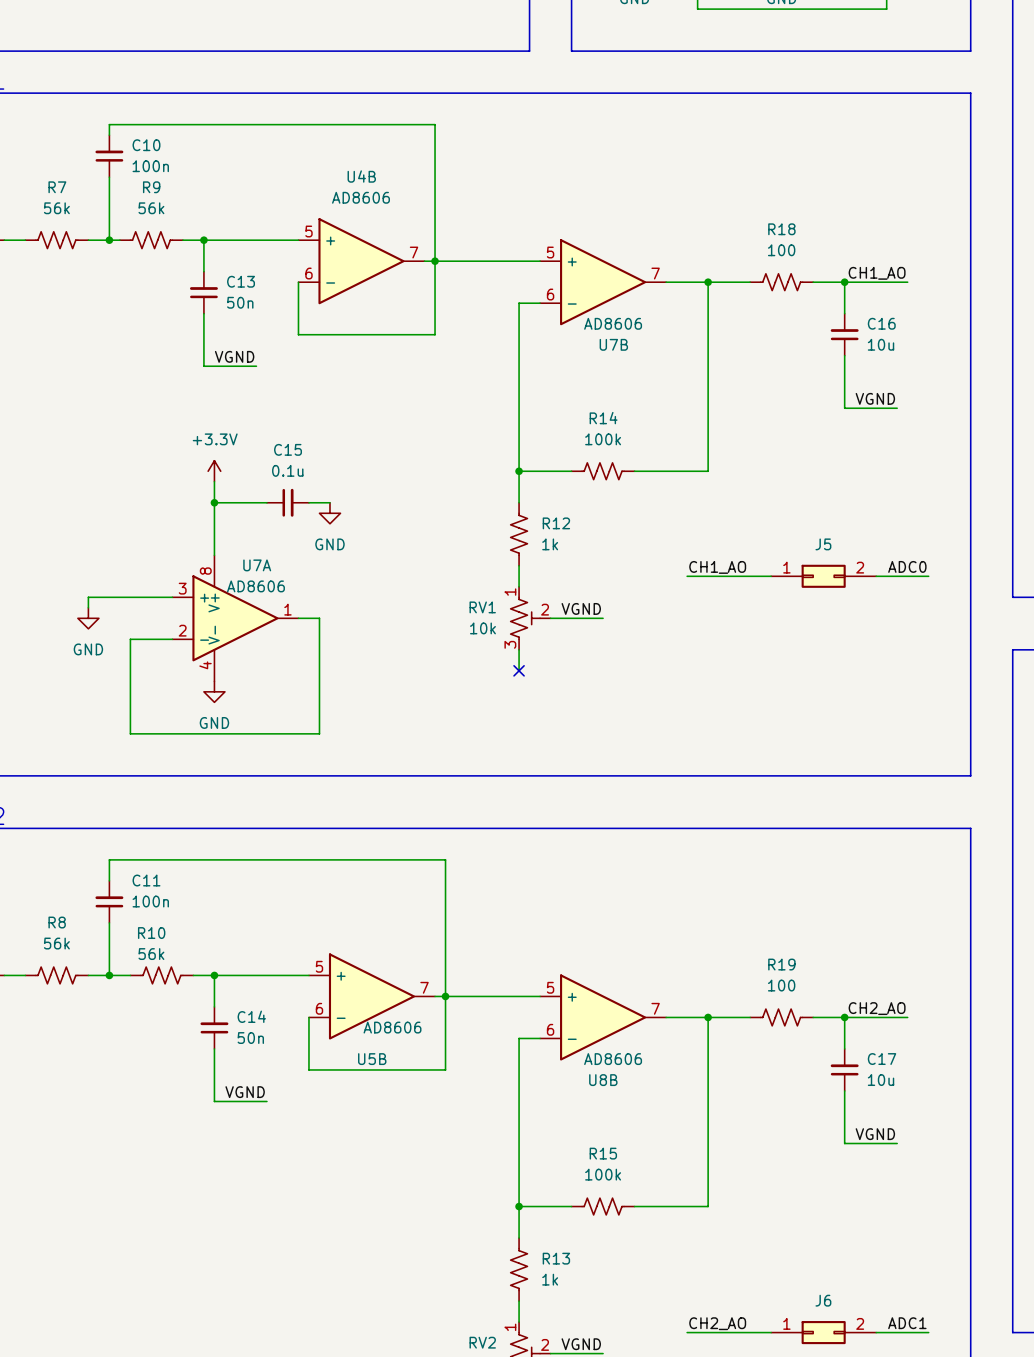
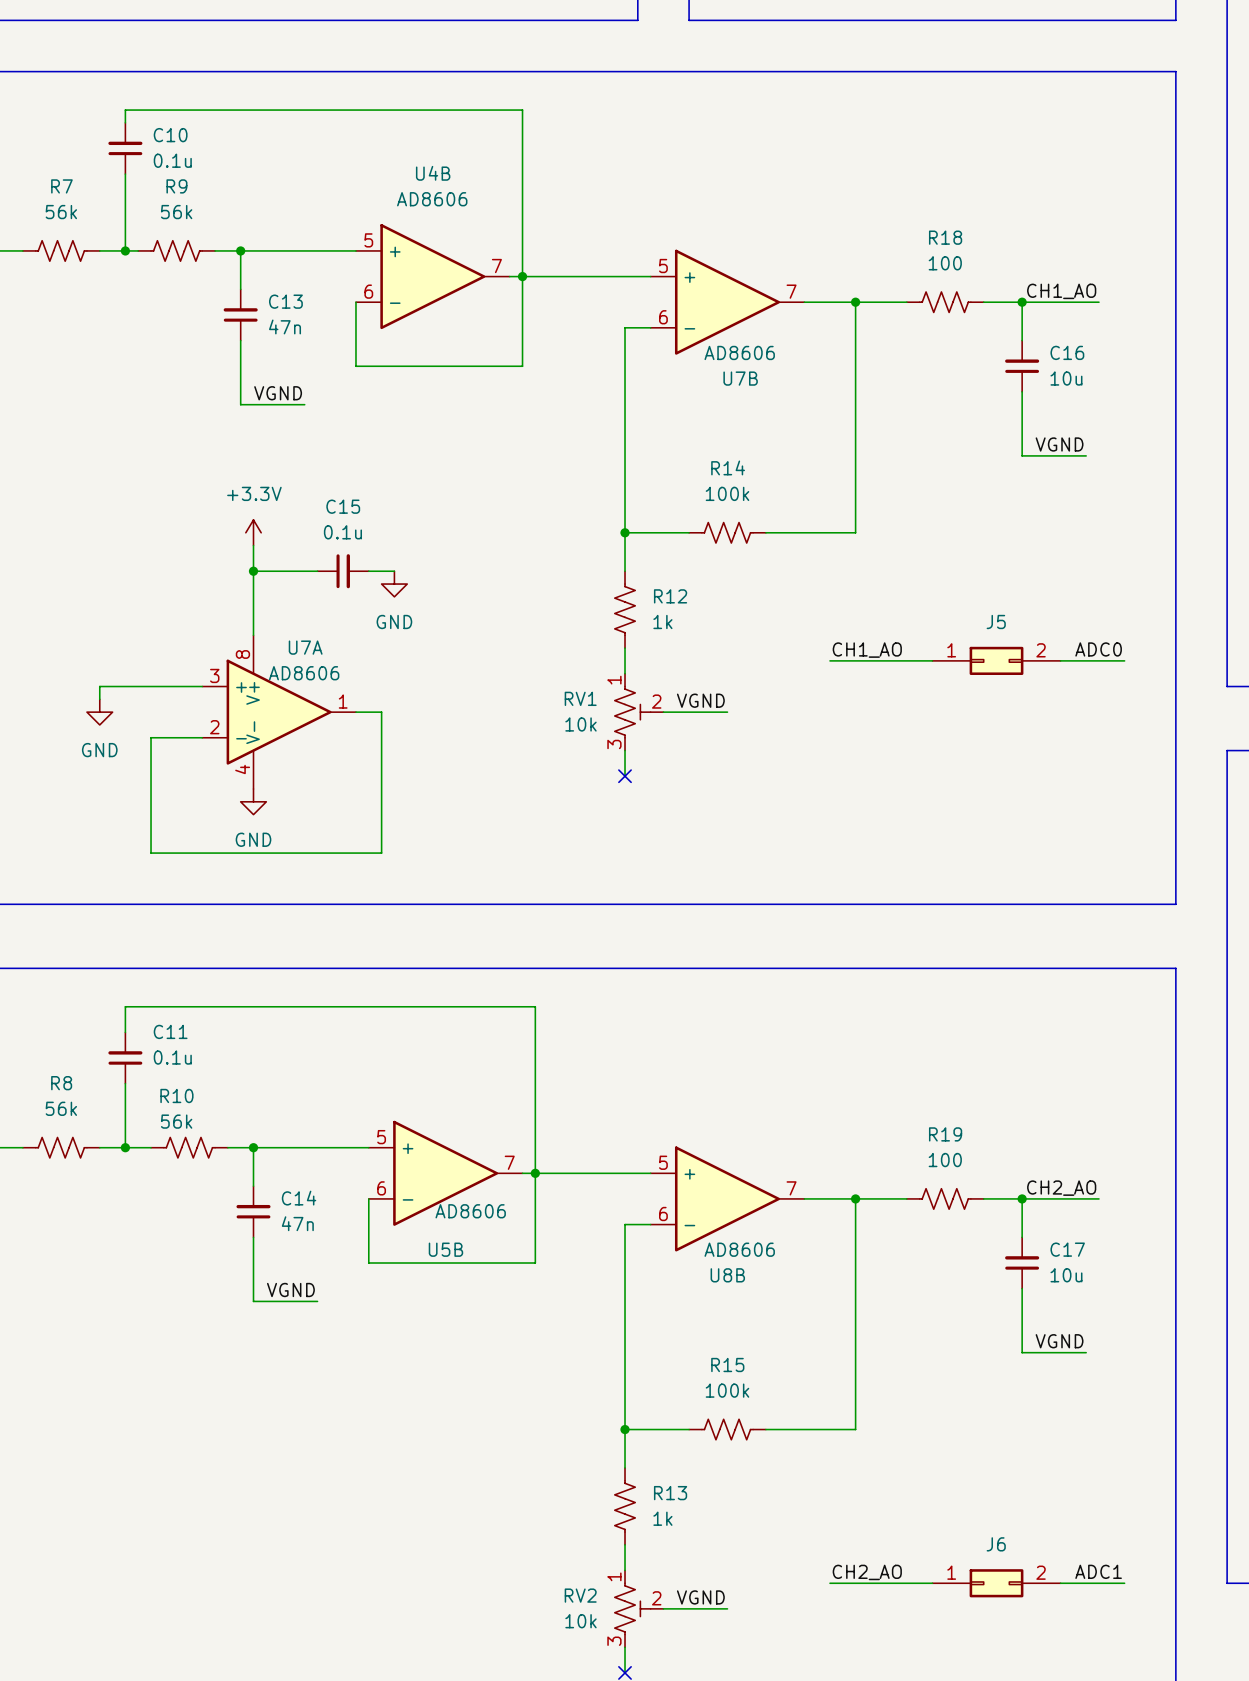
C10 value: 100n (150, 166) -> 0.1u (172, 160)
C13 value: 50n (240, 302) -> 47n (285, 326)
C11 value: 100n (150, 901) -> 0.1u (172, 1057)
C14 value: 50n (250, 1038) -> 47n (297, 1223)

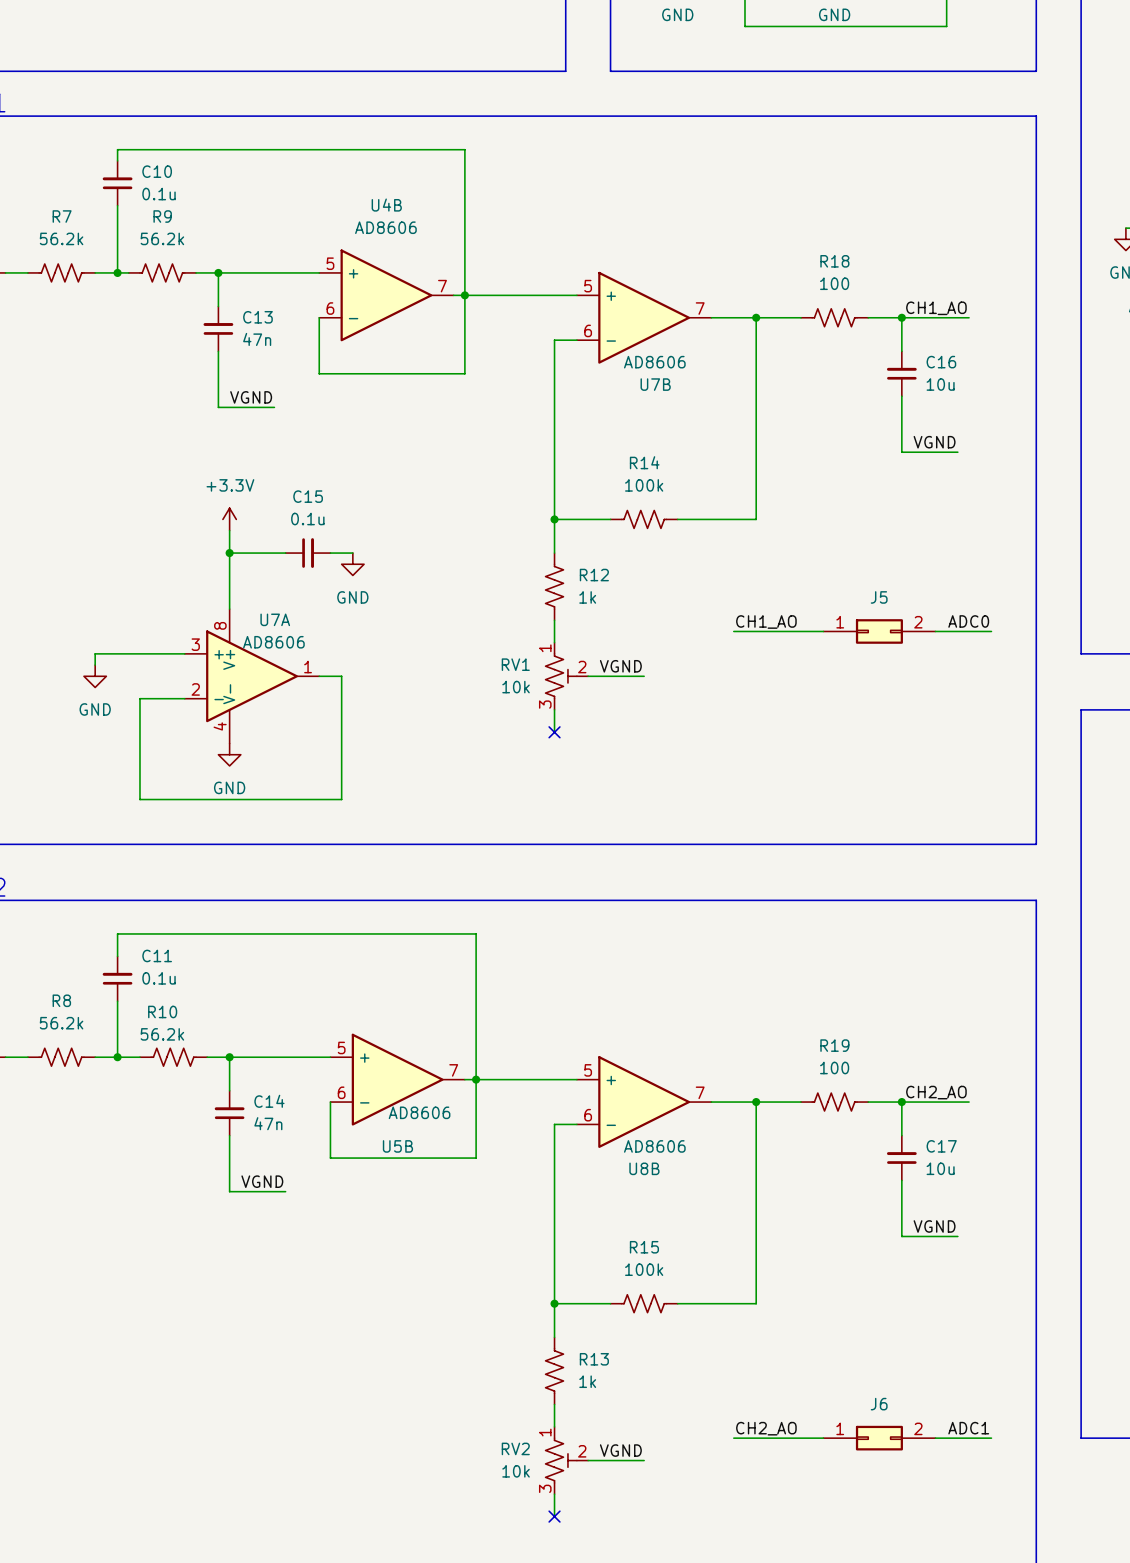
R7 value: 56k (61, 212) -> 56.2k (61, 238)
R9 value: 56k (176, 212) -> 56.2k (162, 238)
R8 value: 56k (61, 1108) -> 56.2k (61, 1023)
R10 value: 56k (176, 1121) -> 56.2k (162, 1034)

